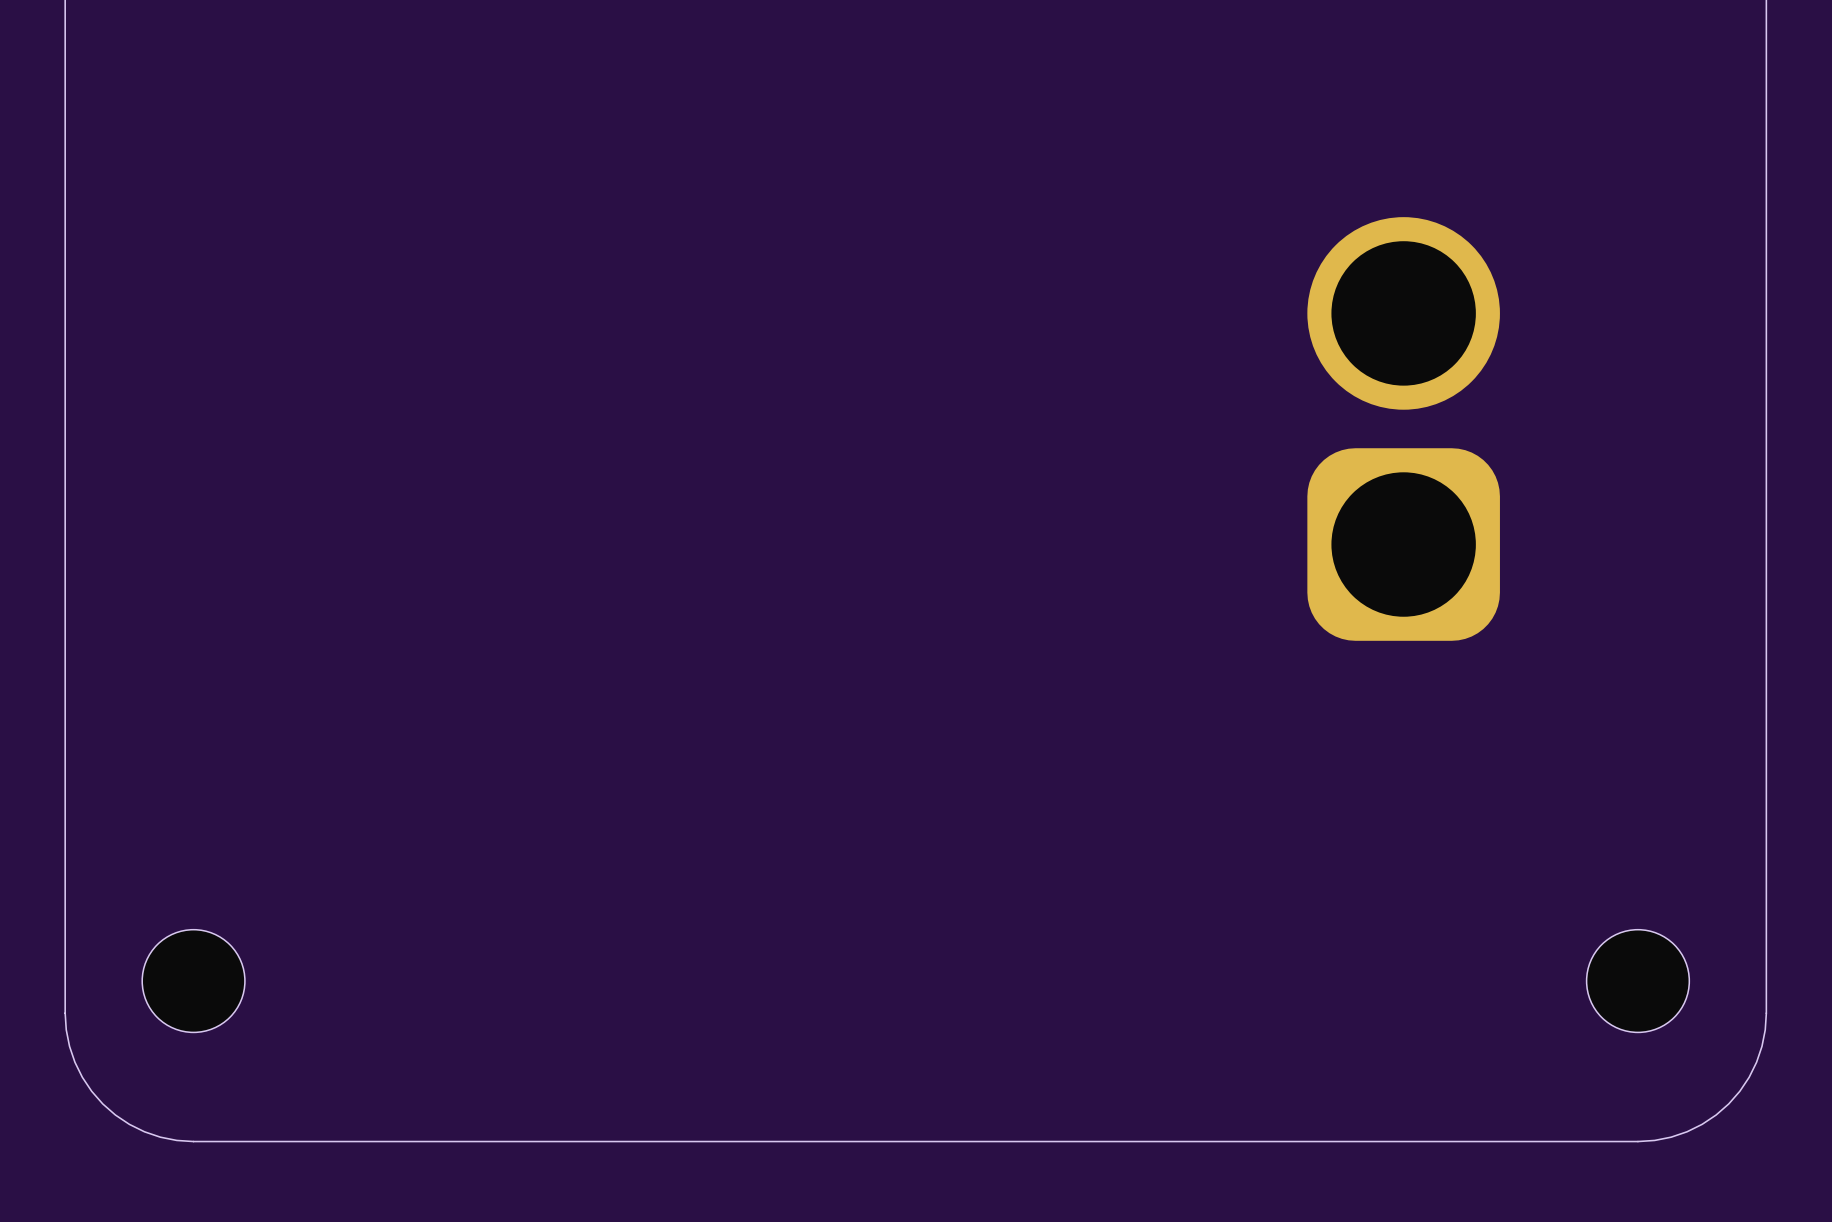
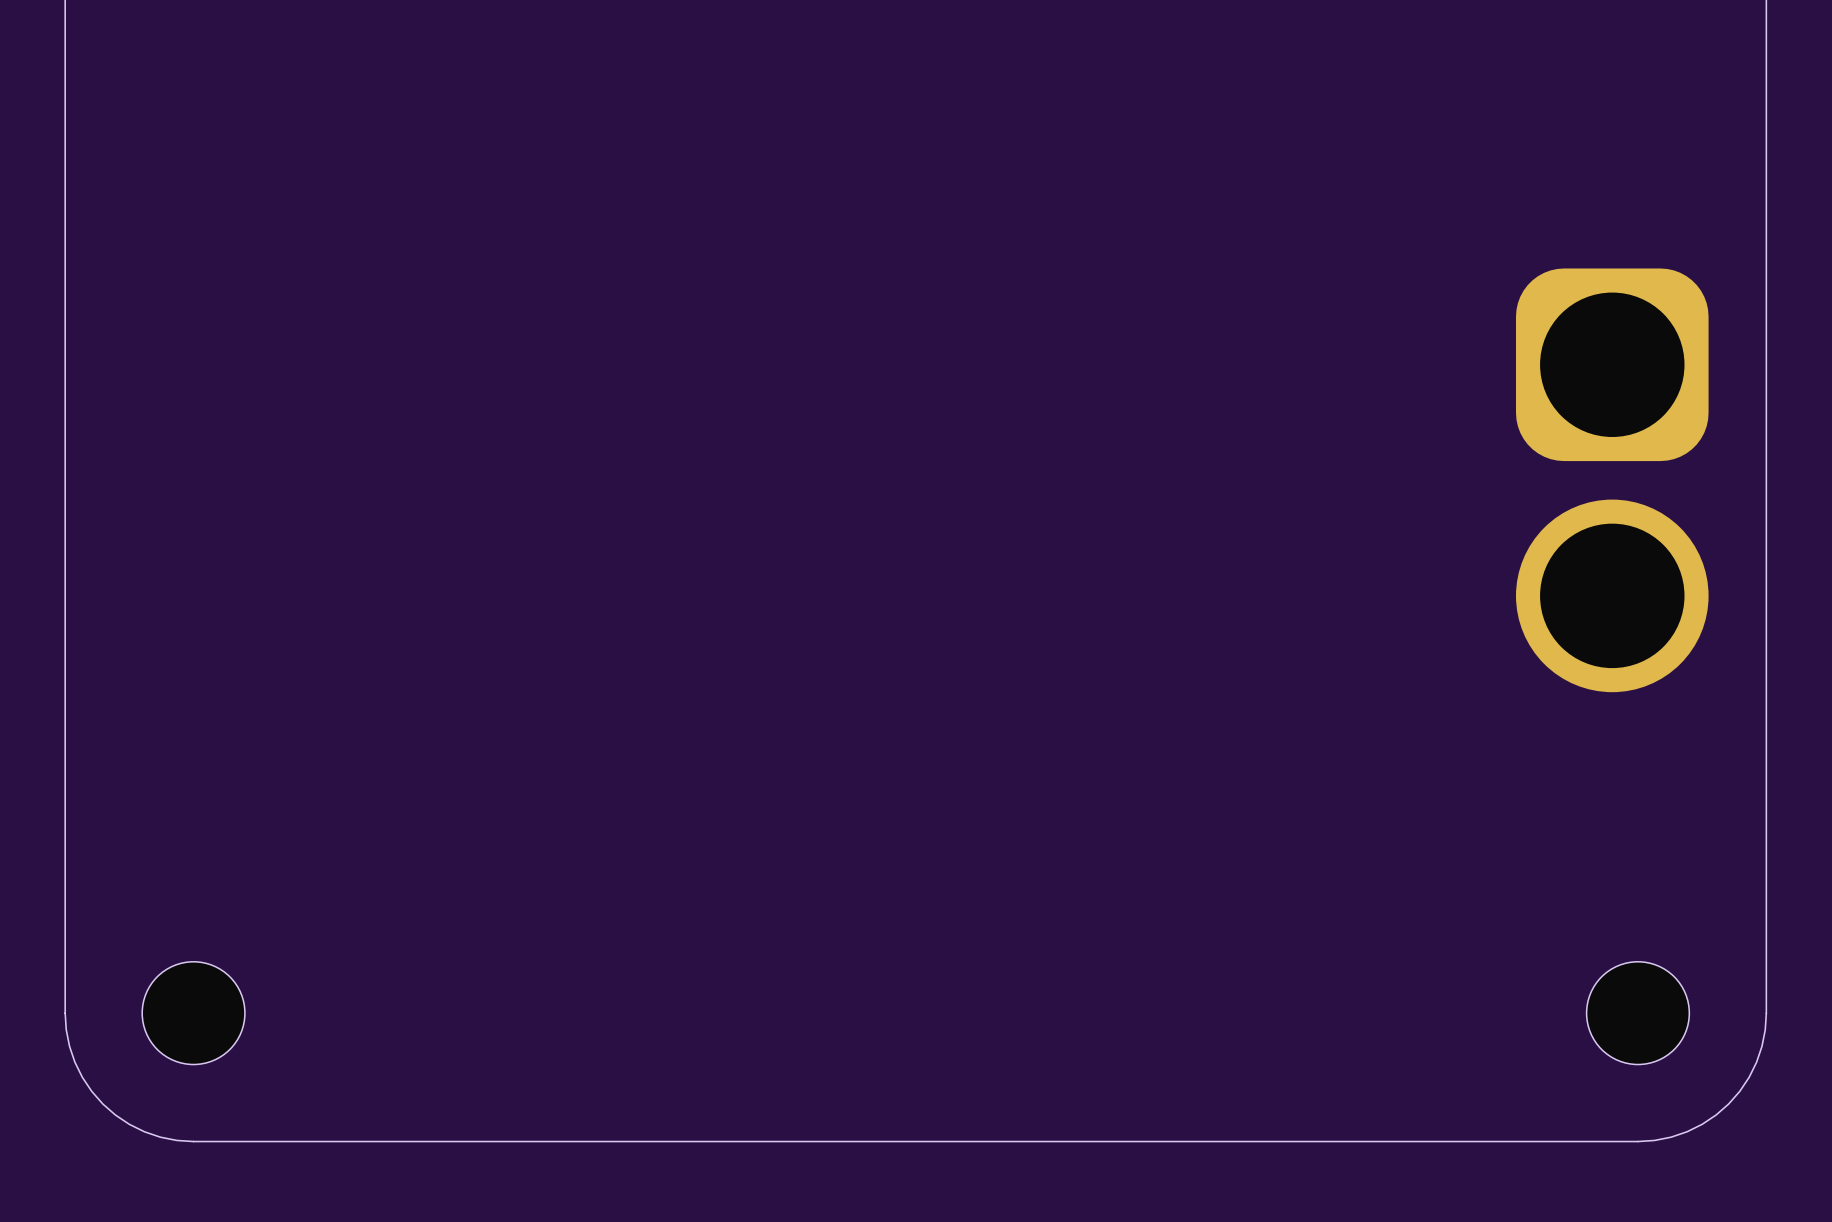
part rotation: 0° (1403, 428) -> 180° (1612, 480)
part position: (193, 981) -> (193, 1013)
part position: (1637, 981) -> (1637, 1013)

